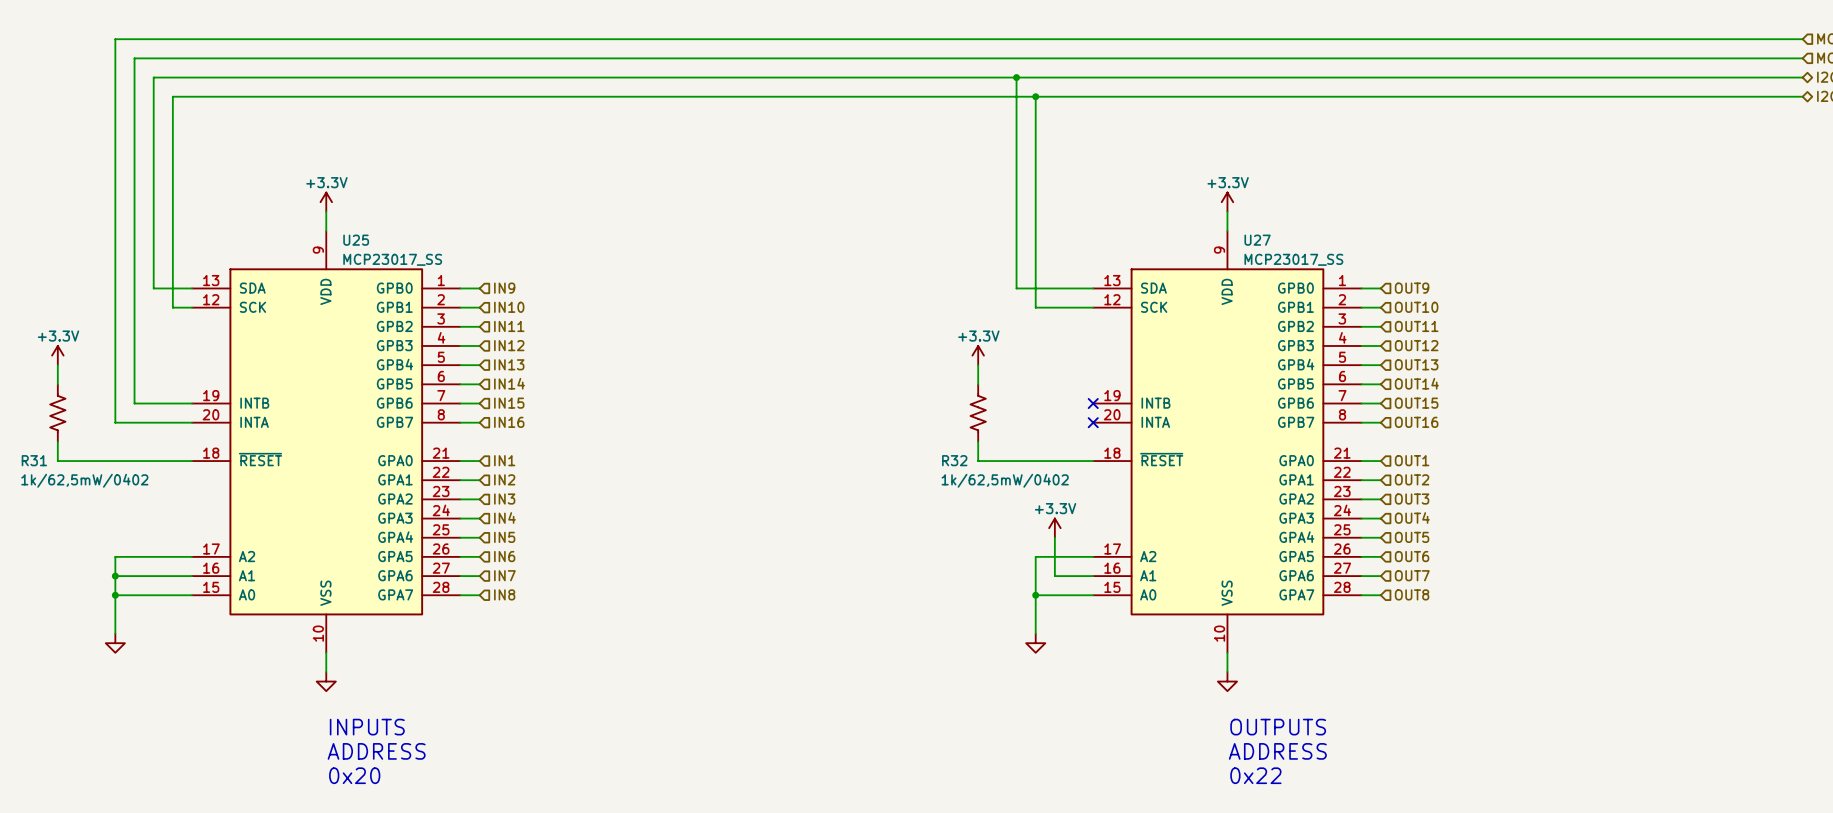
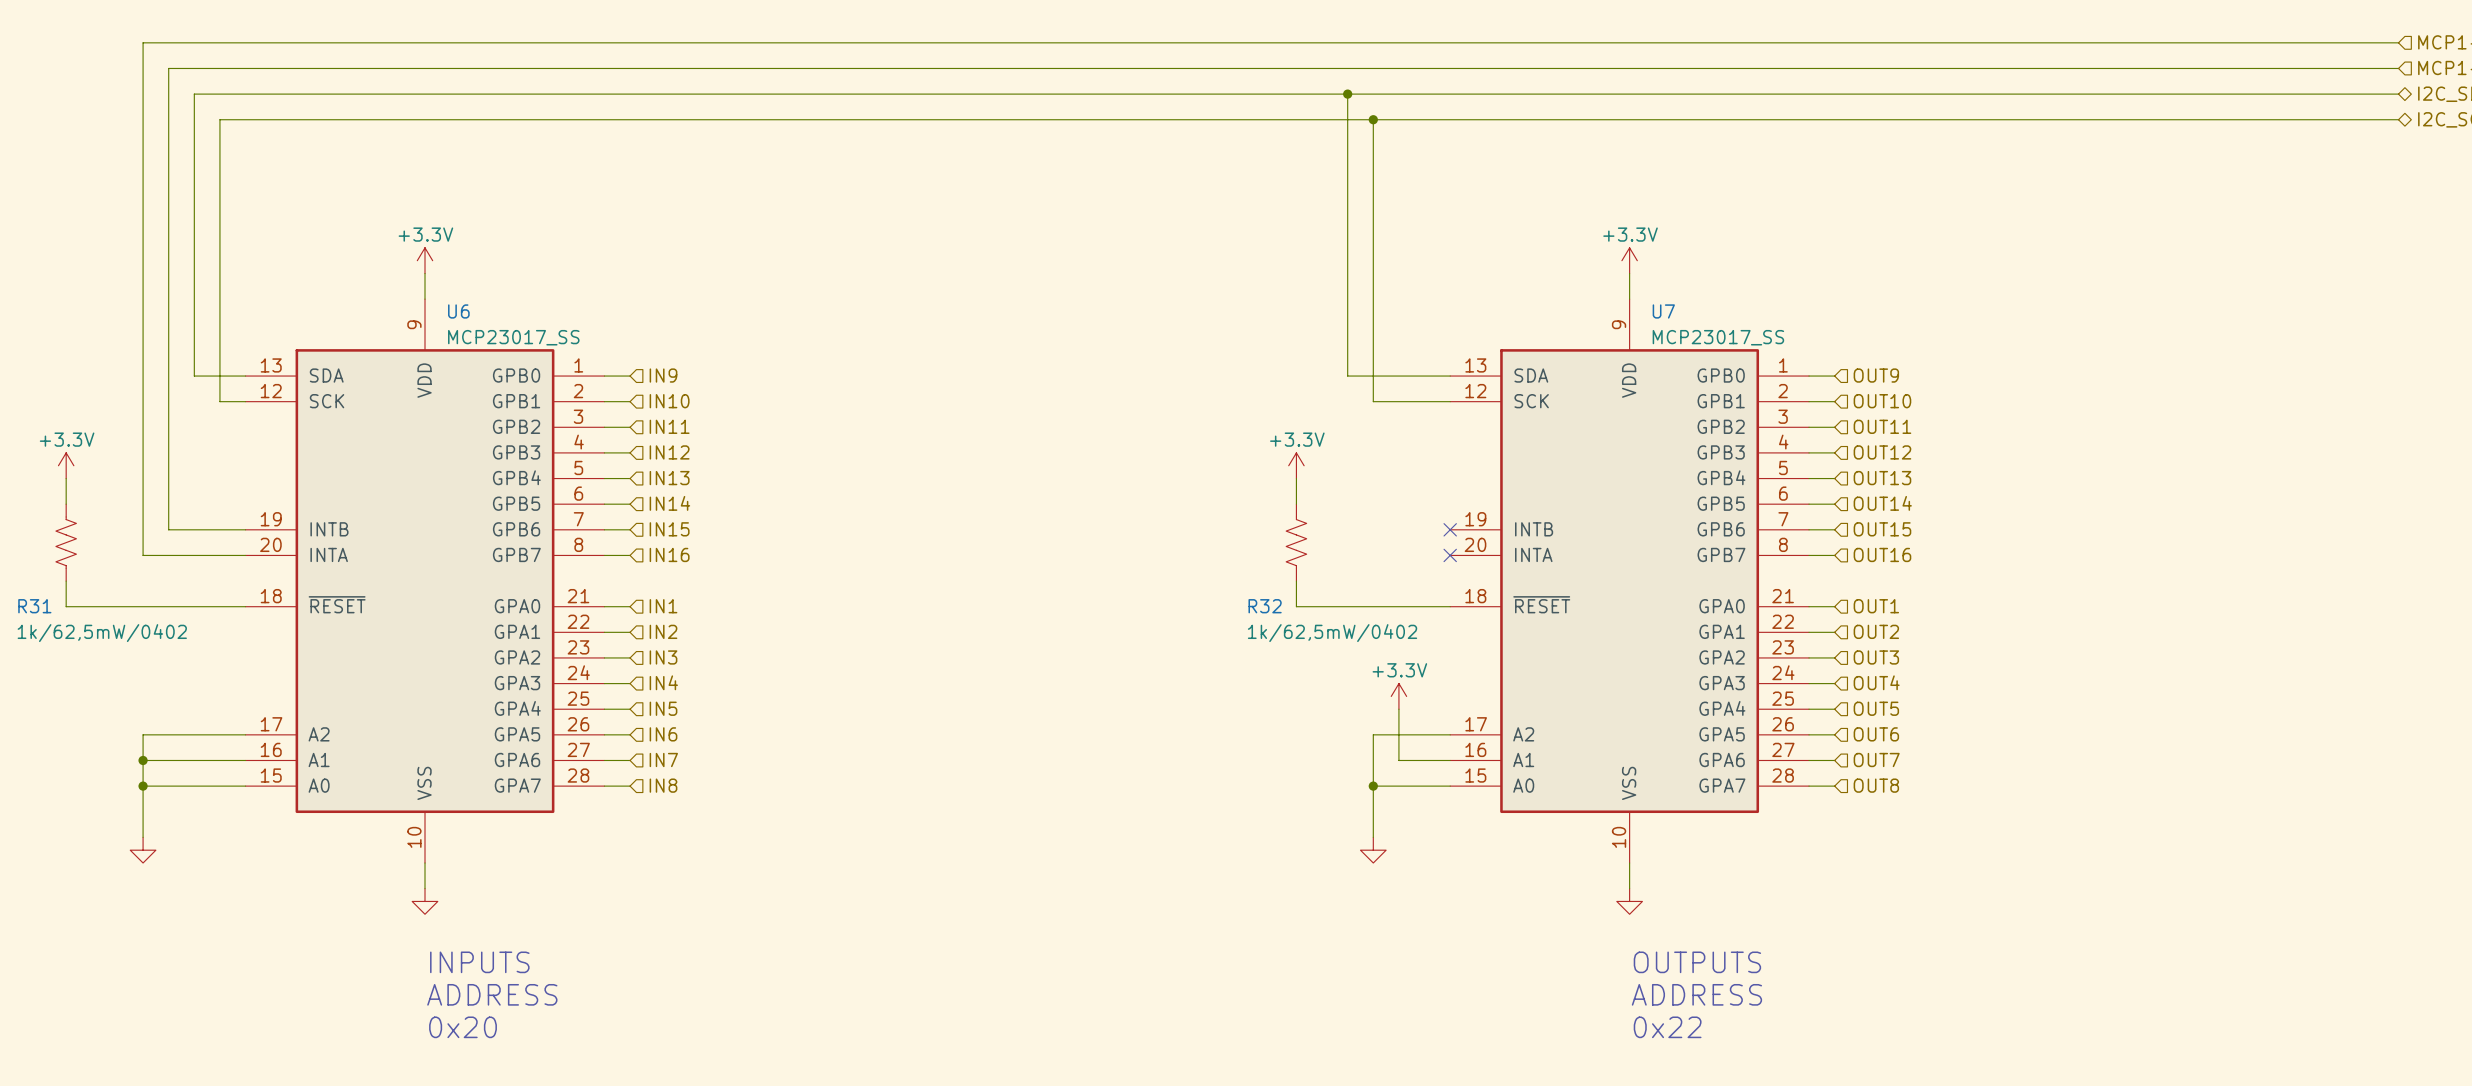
U25 name: U25 (356, 240) -> U6 (458, 311)
U27 name: U27 (1257, 240) -> U7 (1663, 311)

